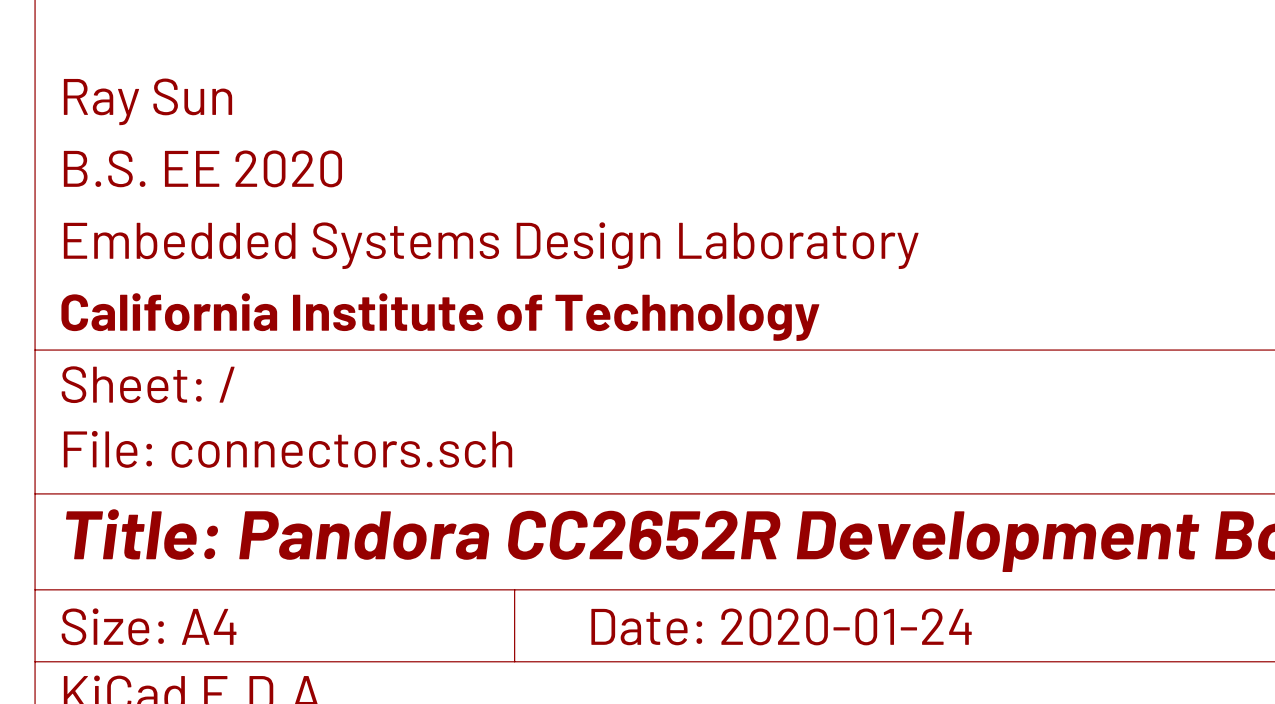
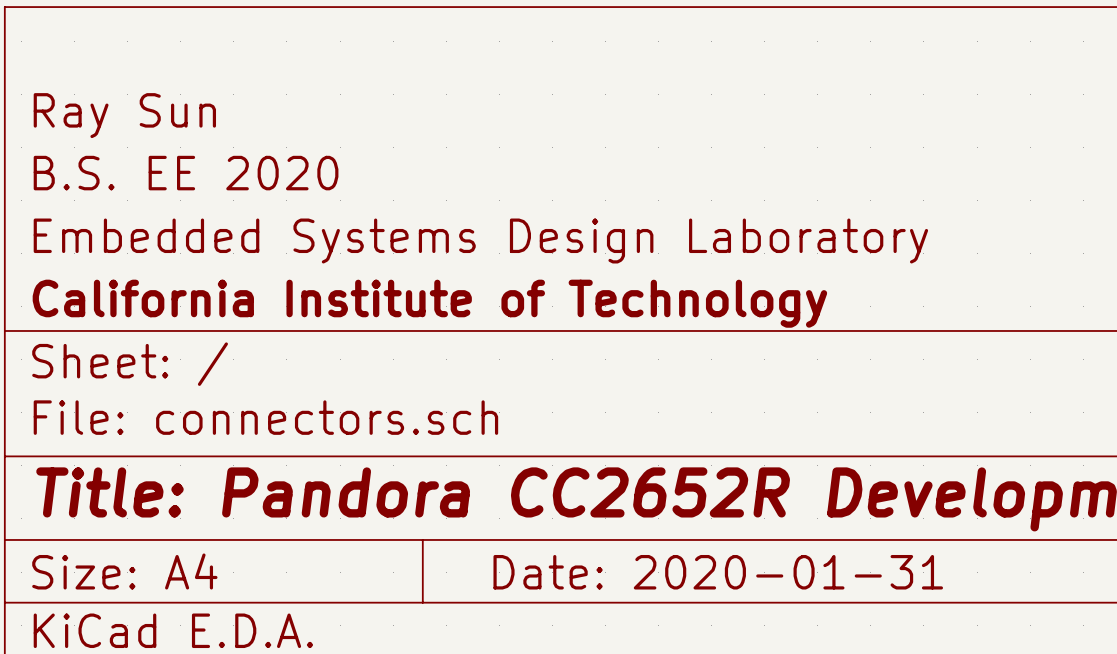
title block: Date: 2020-01-24 (781, 626) -> Date: 2020-01-31 (718, 572)

